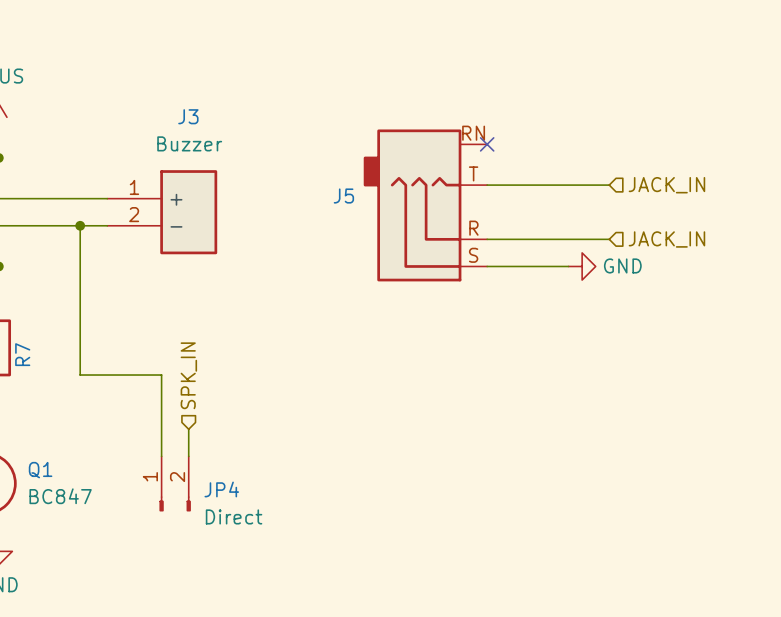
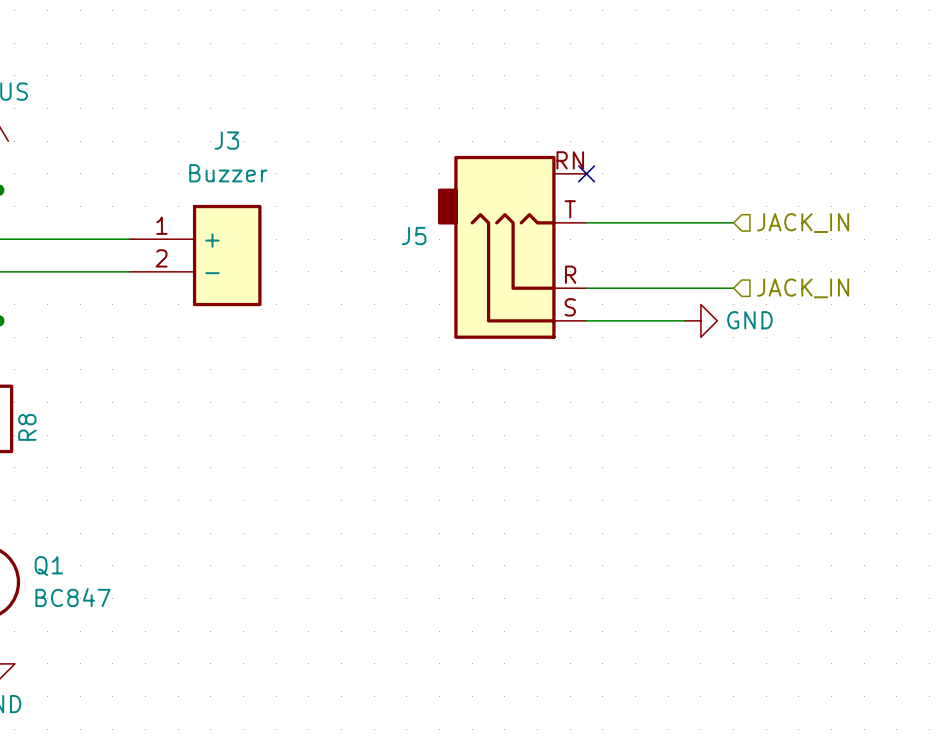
wire: (80, 225) (80, 375) (161, 375) (161, 456) -> none
junction: (80, 225) -> none
R7 name: R7 (22, 354) -> R8 (27, 427)
hierarchical label: SPK_IN (188, 375) -> none
wire: (188, 429) (188, 456) -> none
JP4: Direct (175, 483) -> none

